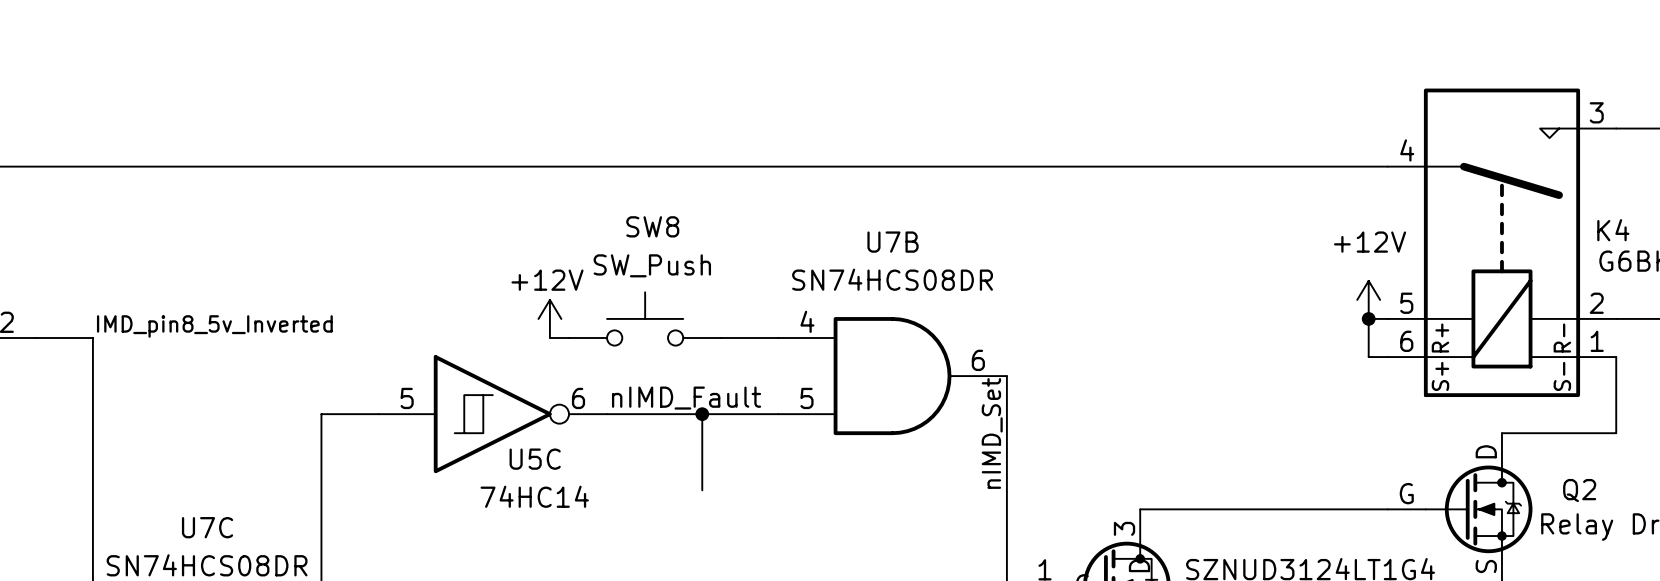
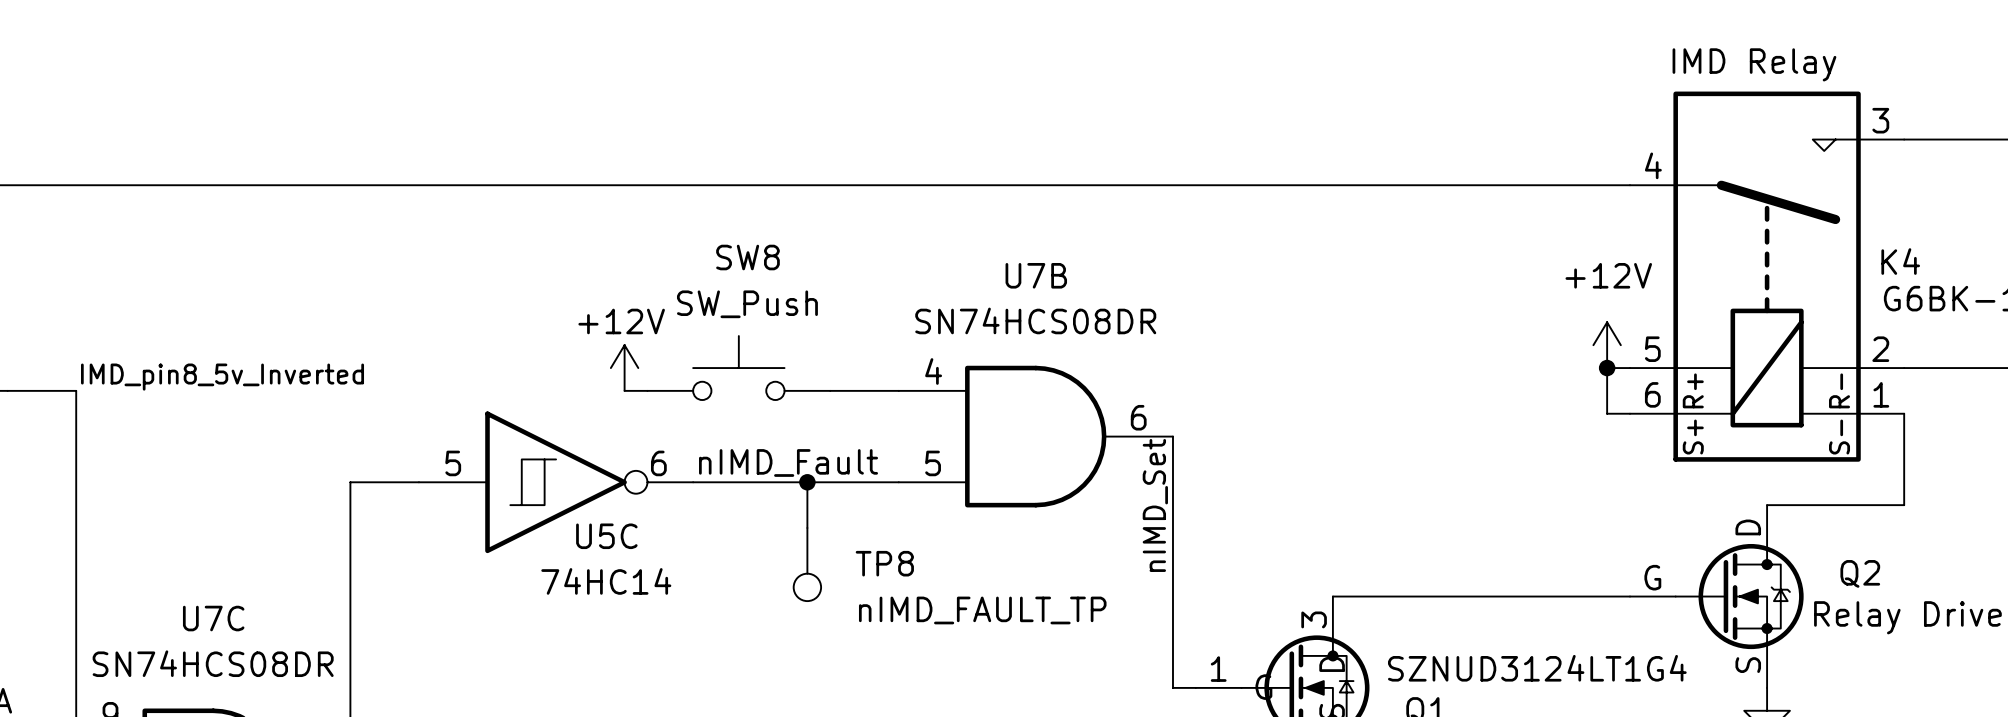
text: none -> IMD Relay (1754, 64)
TP8: none -> nIMD_FAULT_TP (807, 564)

